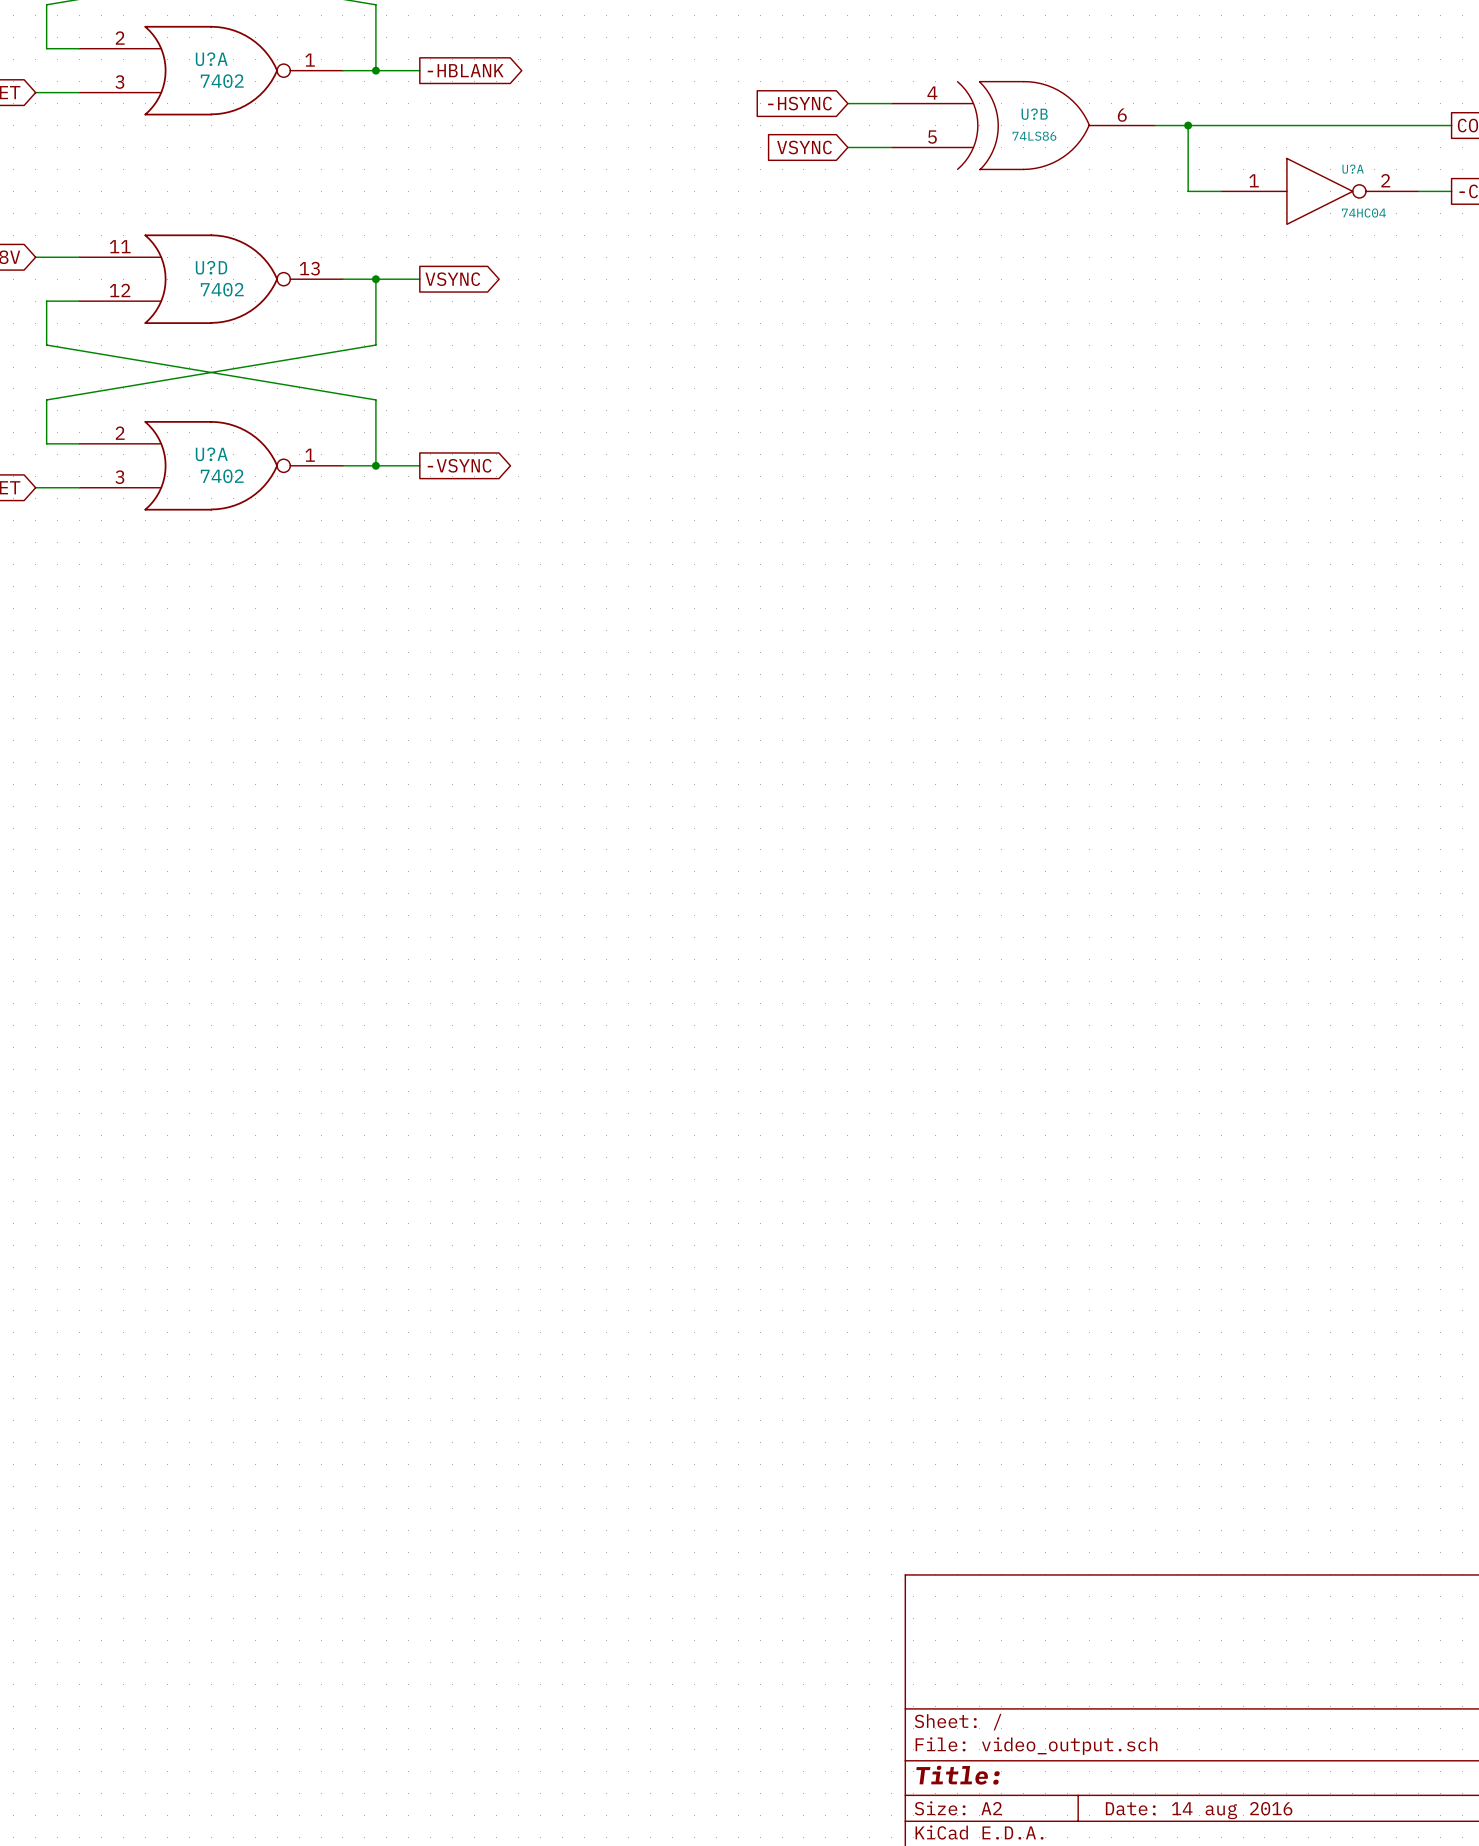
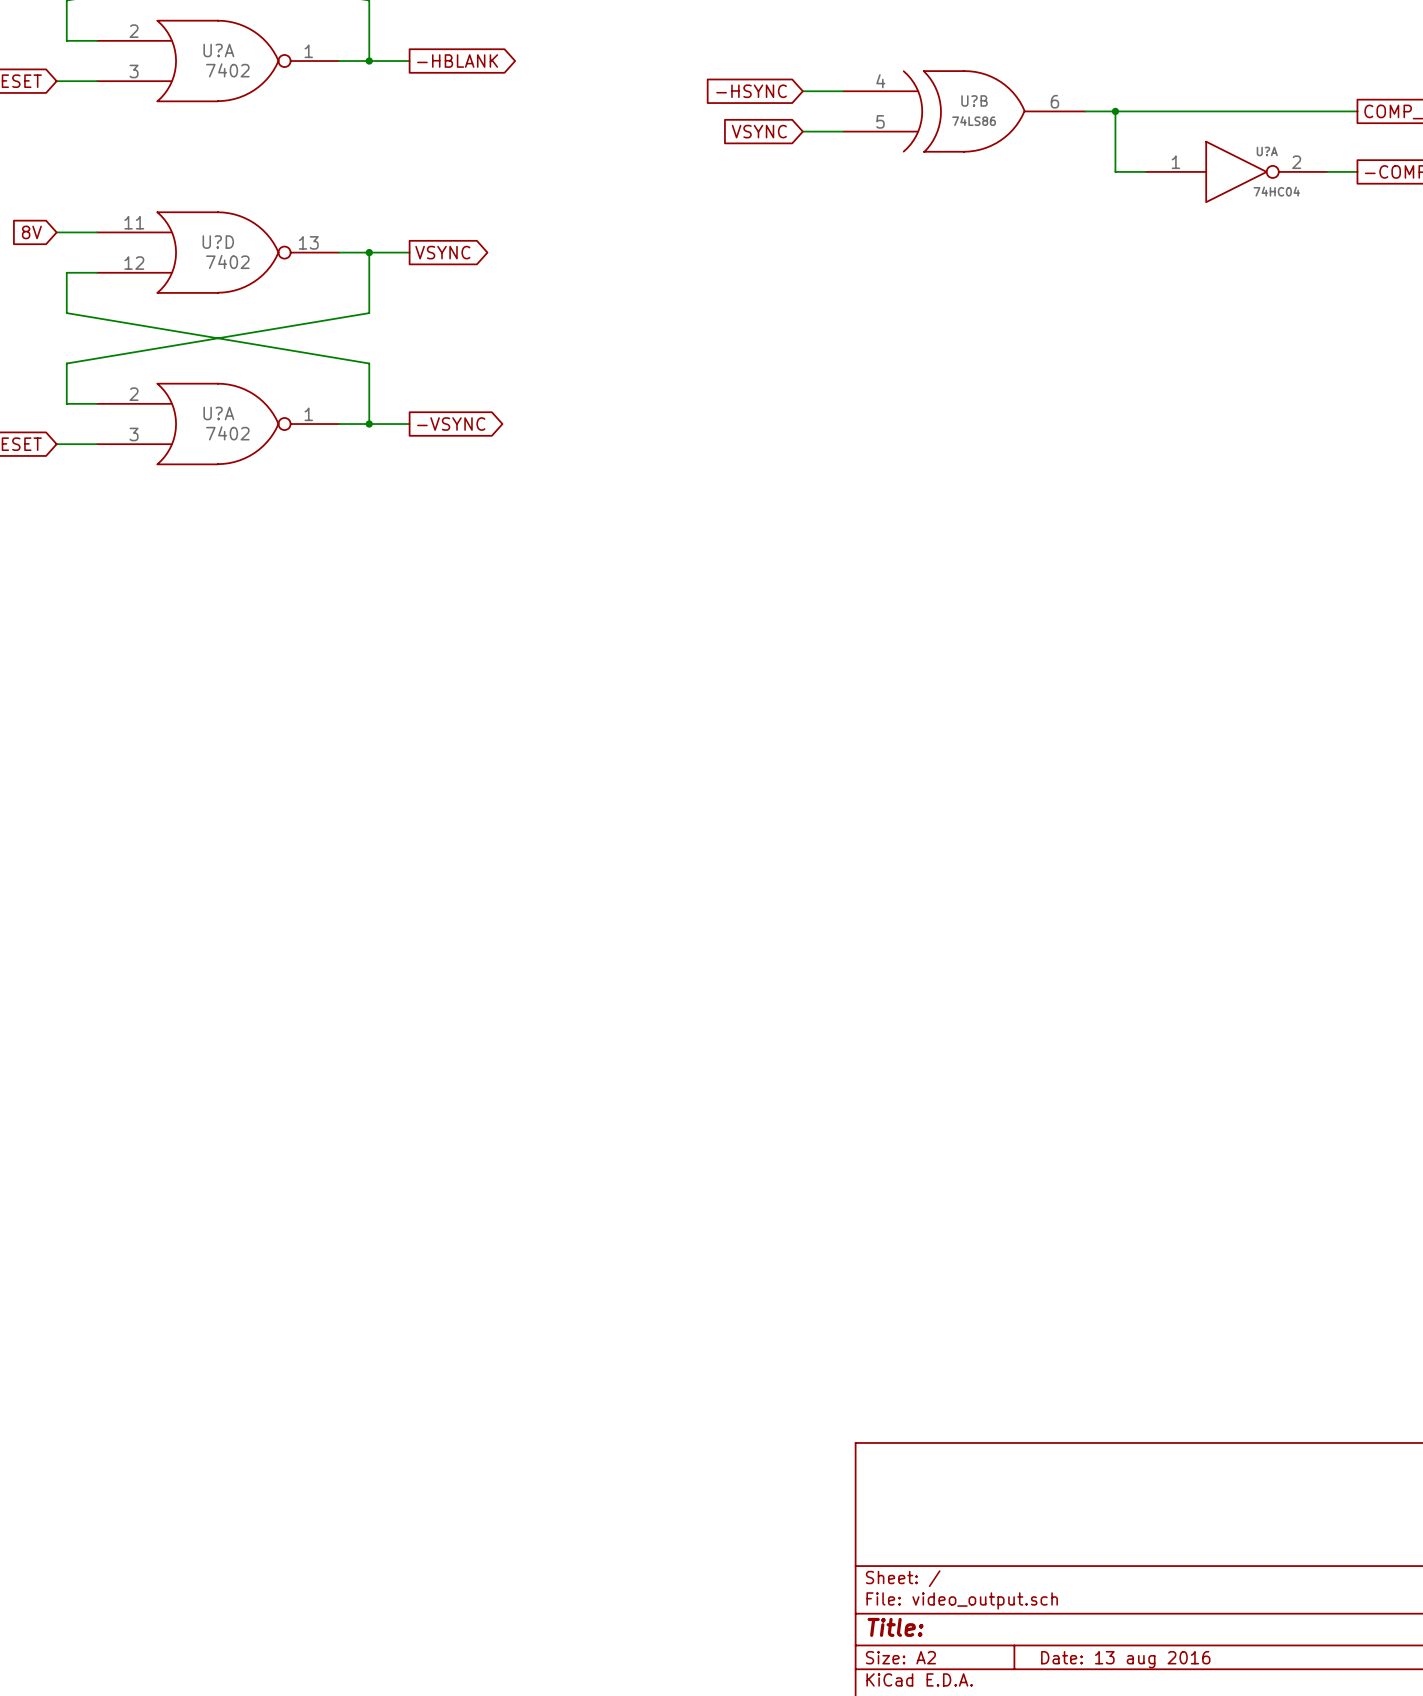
title block: Date: 14 aug 2016 (1199, 1810) -> Date: 13 aug 2016 (1125, 1659)

